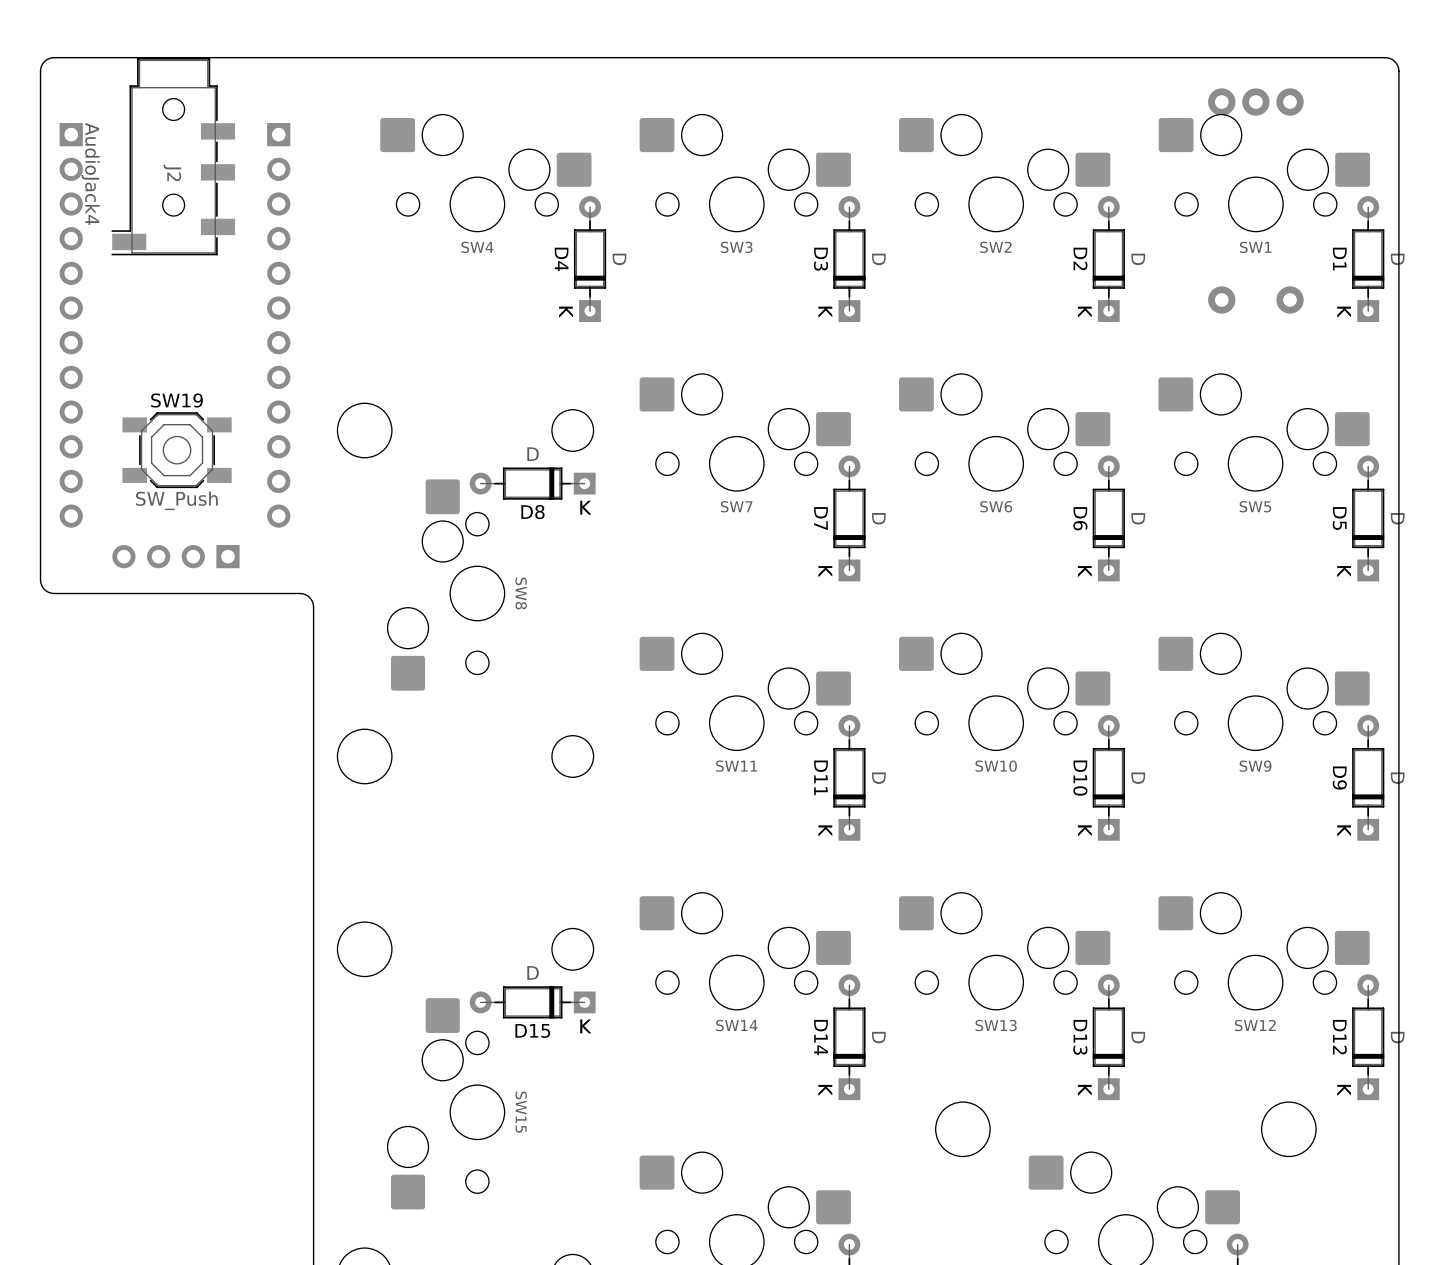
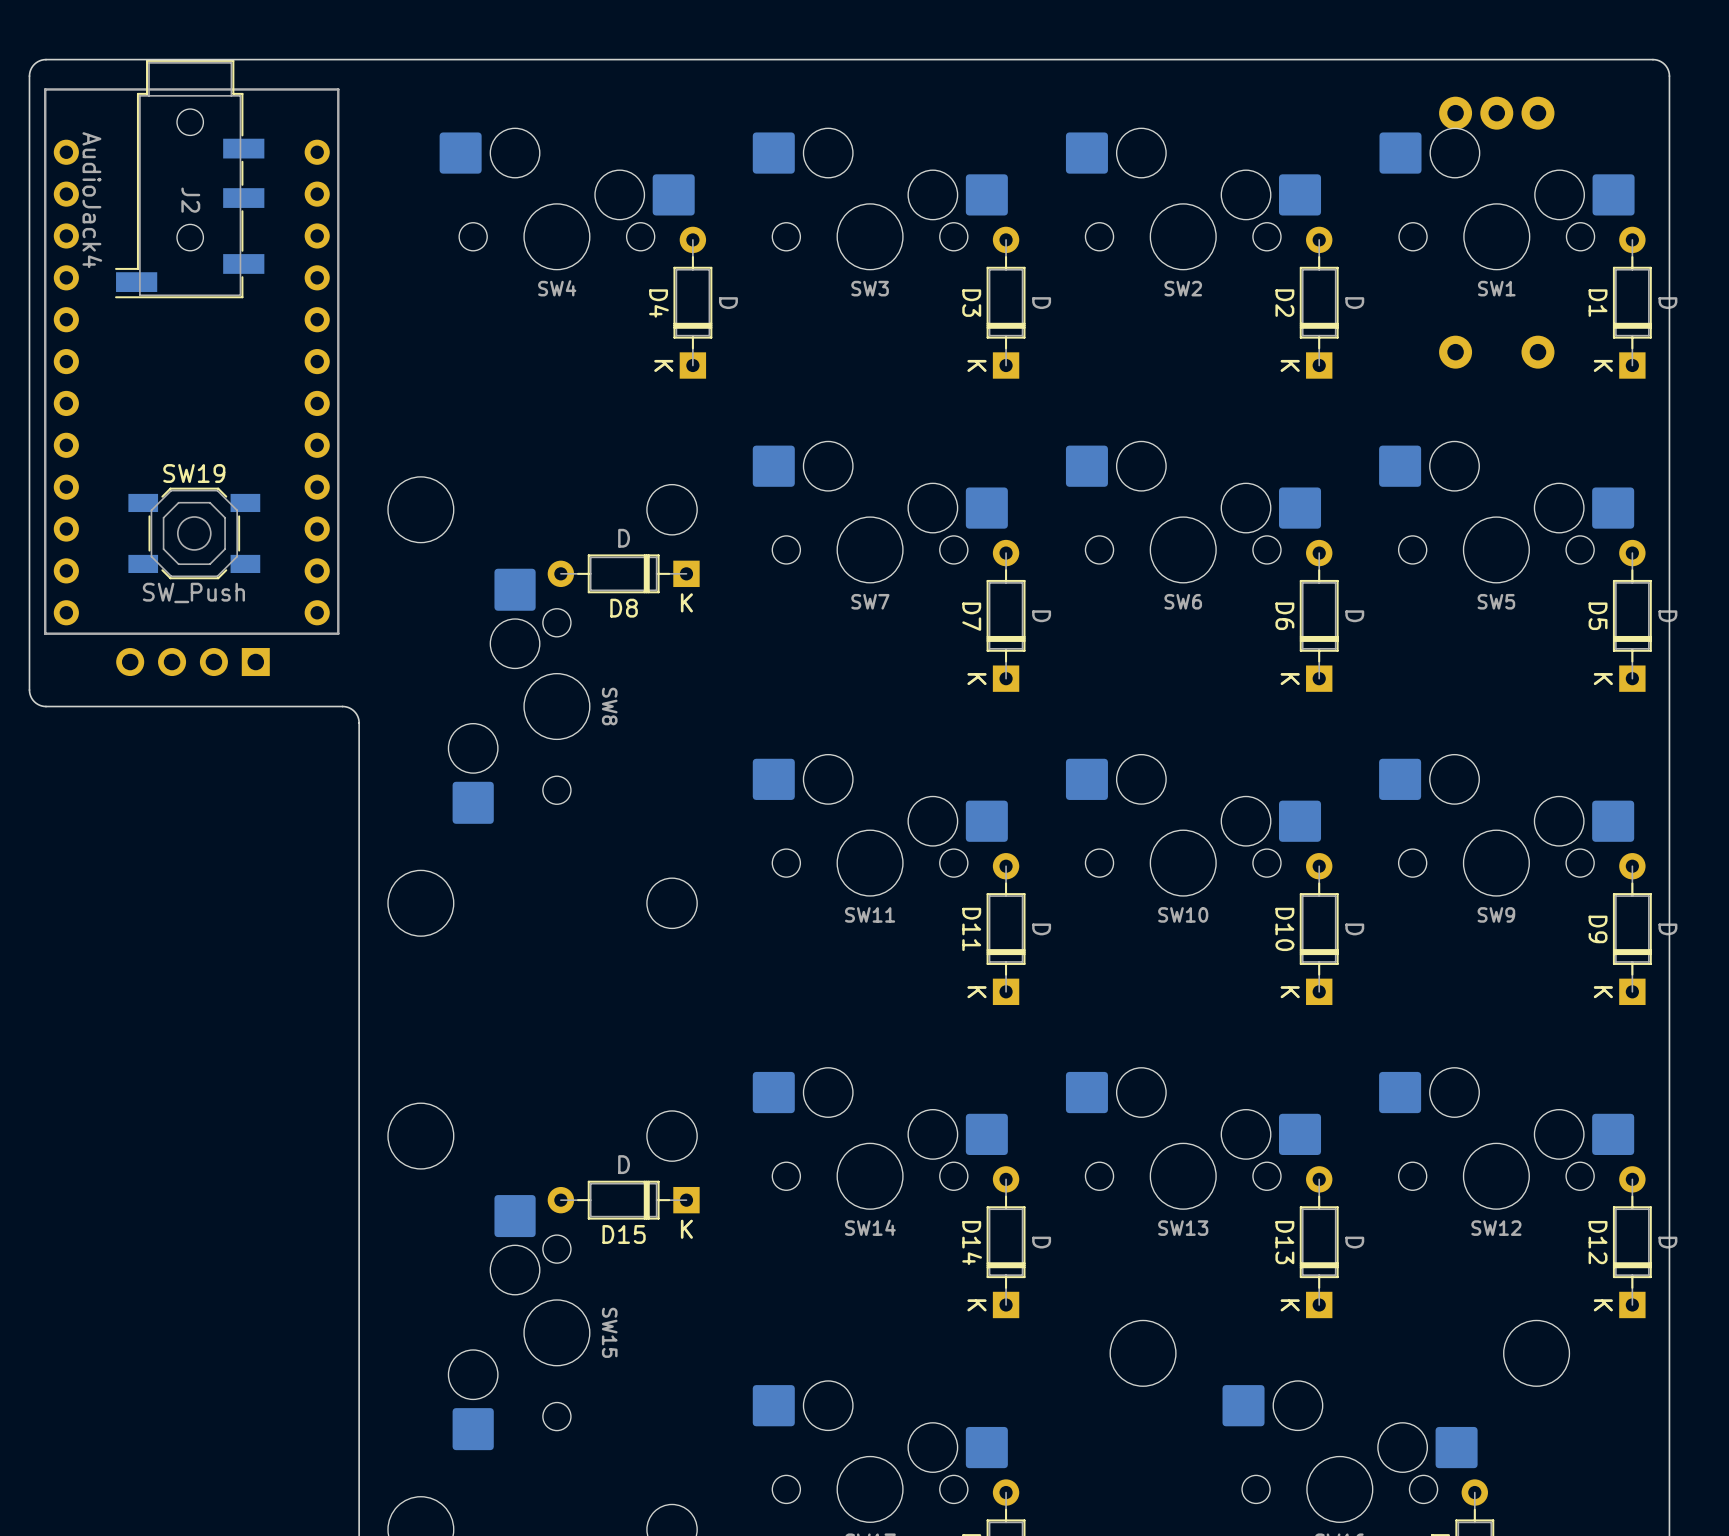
part: none -> (191, 361)
part: (71, 325) -> none
part: (278, 325) -> none

